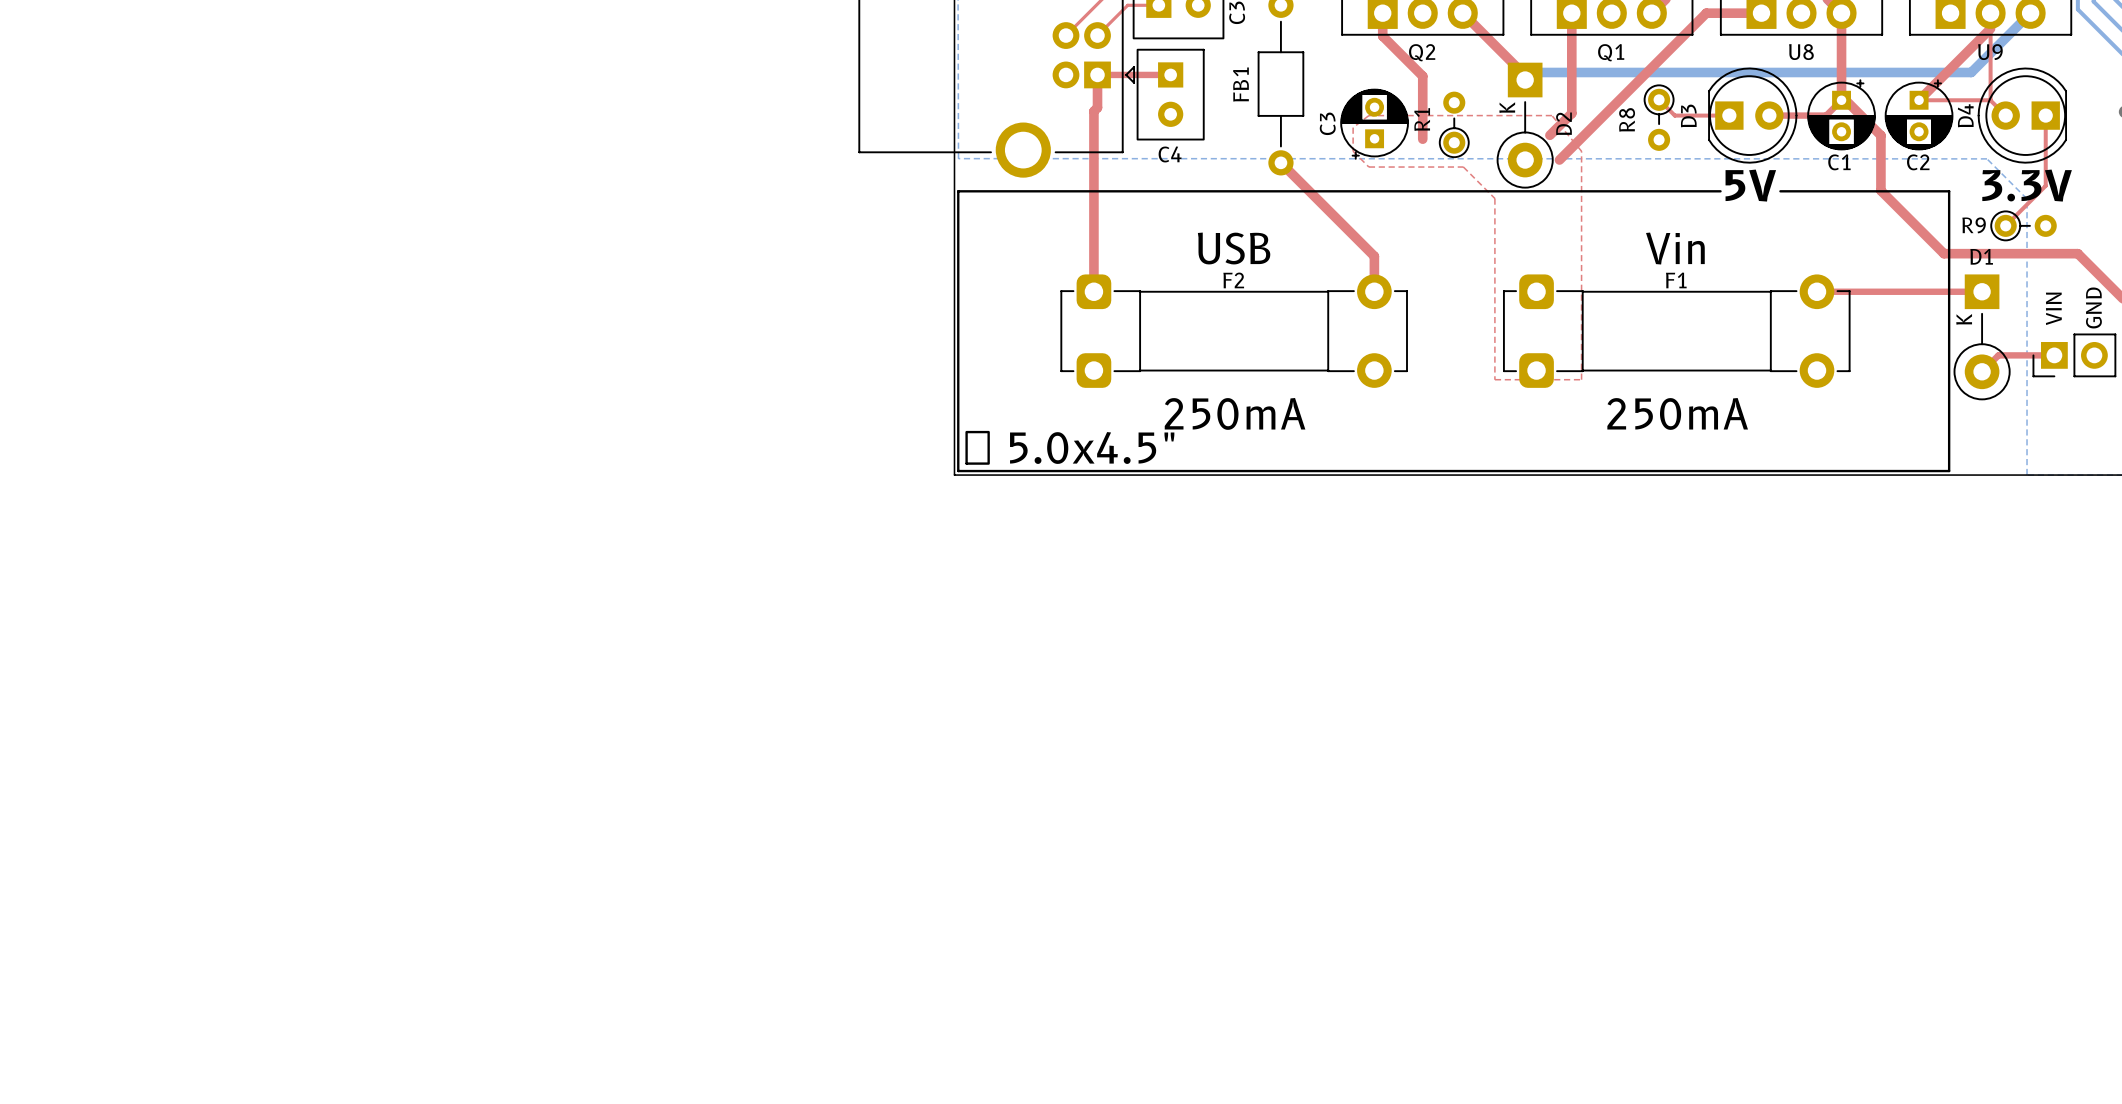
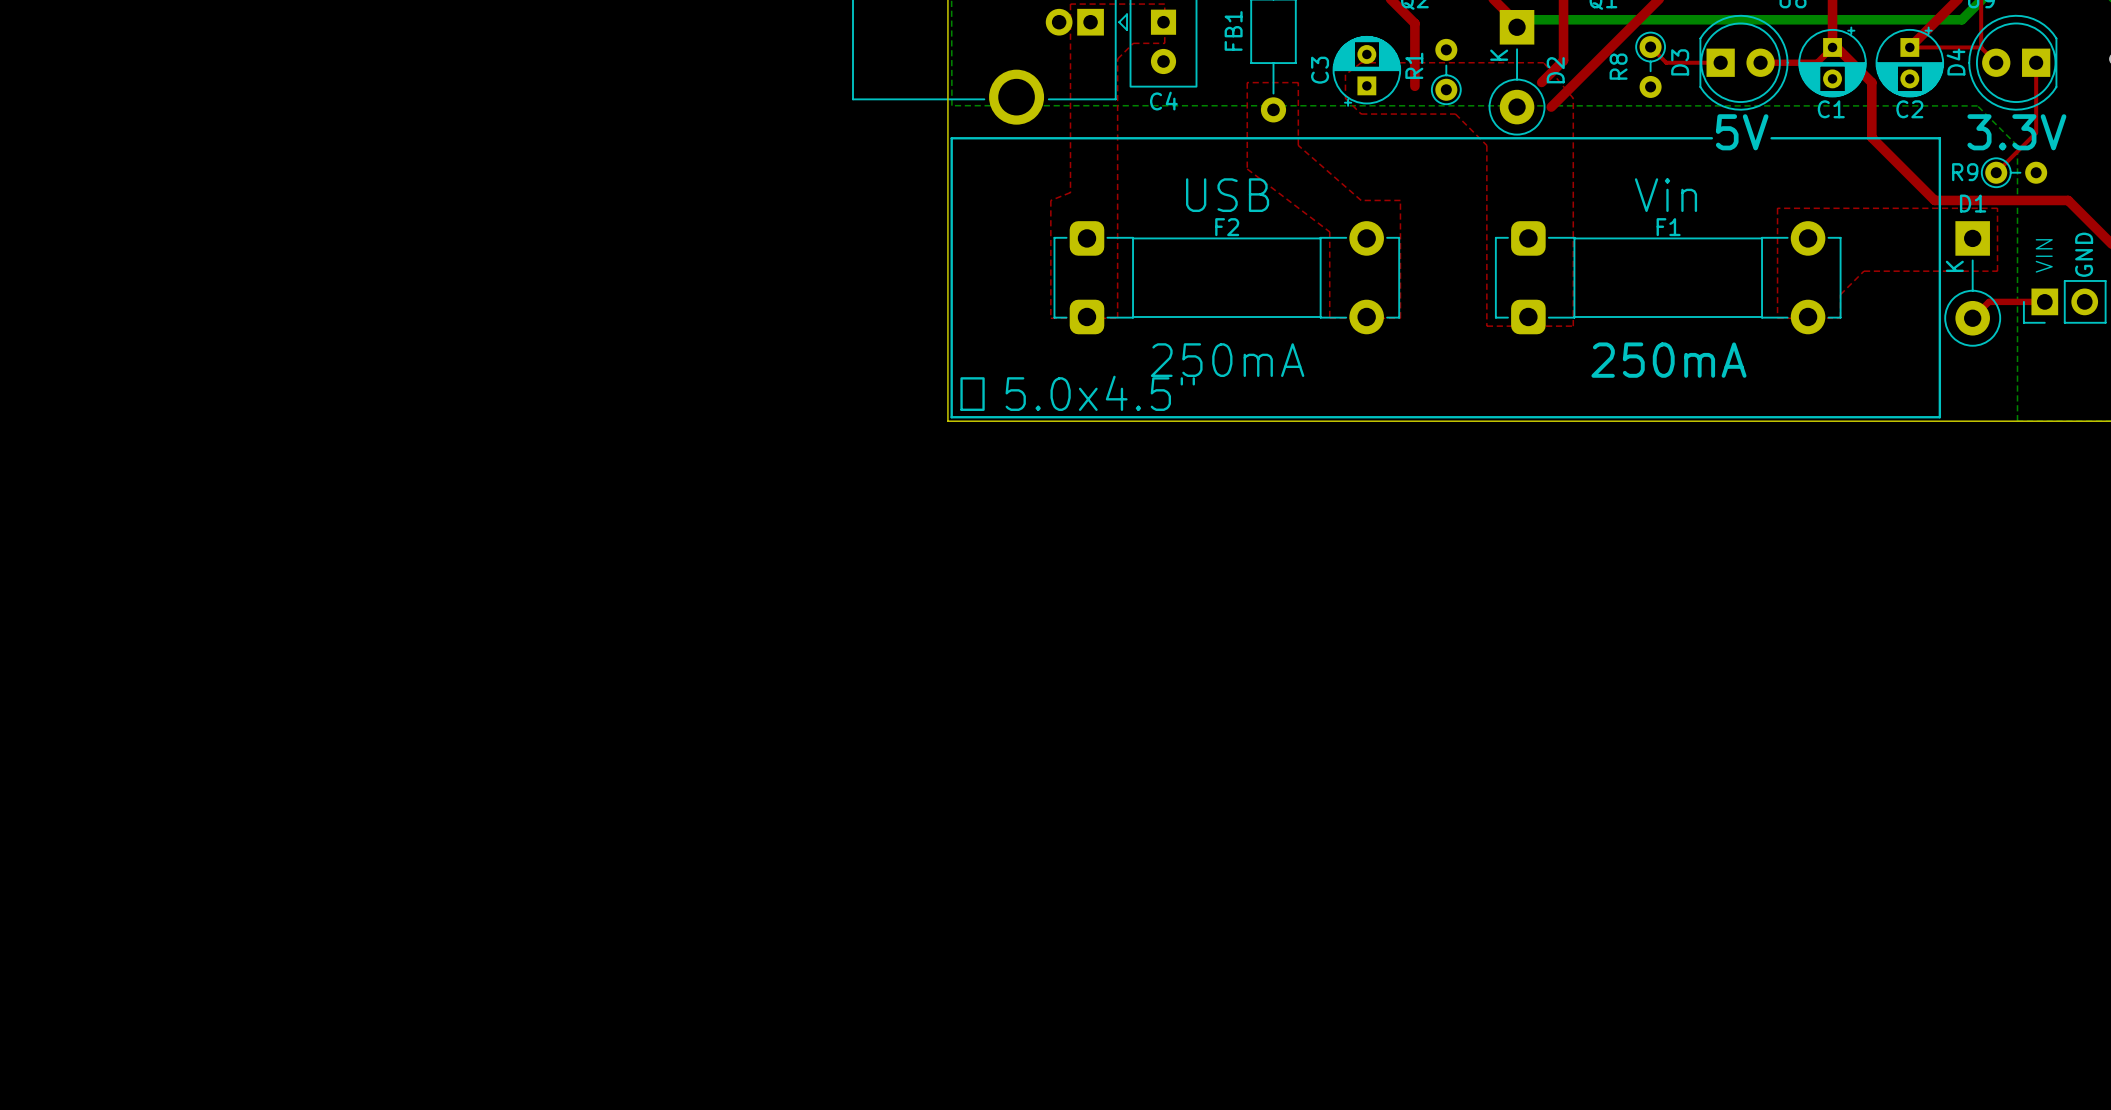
top zone outline: none -> (1070, 4) (1070, 192) (1050, 200) (1050, 318) (1117, 318) (1117, 59) (1133, 43) (1164, 43) (1164, 4) (1070, 4)
top track: (1170, 74) (1097, 74) (1097, 107) (1093, 111) (1093, 291) -> none
top zone outline: none -> (1247, 82) (1298, 82) (1298, 145) (1361, 200) (1400, 200) (1400, 318) (1329, 318) (1329, 231) (1247, 169) (1247, 82)
top track: (1280, 162) (1374, 256) (1374, 291) -> none
top zone outline: none -> (1777, 208) (1997, 208) (1997, 271) (1863, 271) (1840, 294) (1840, 318) (1777, 318) (1777, 208)
top track: (1817, 291) (1982, 291) -> none

